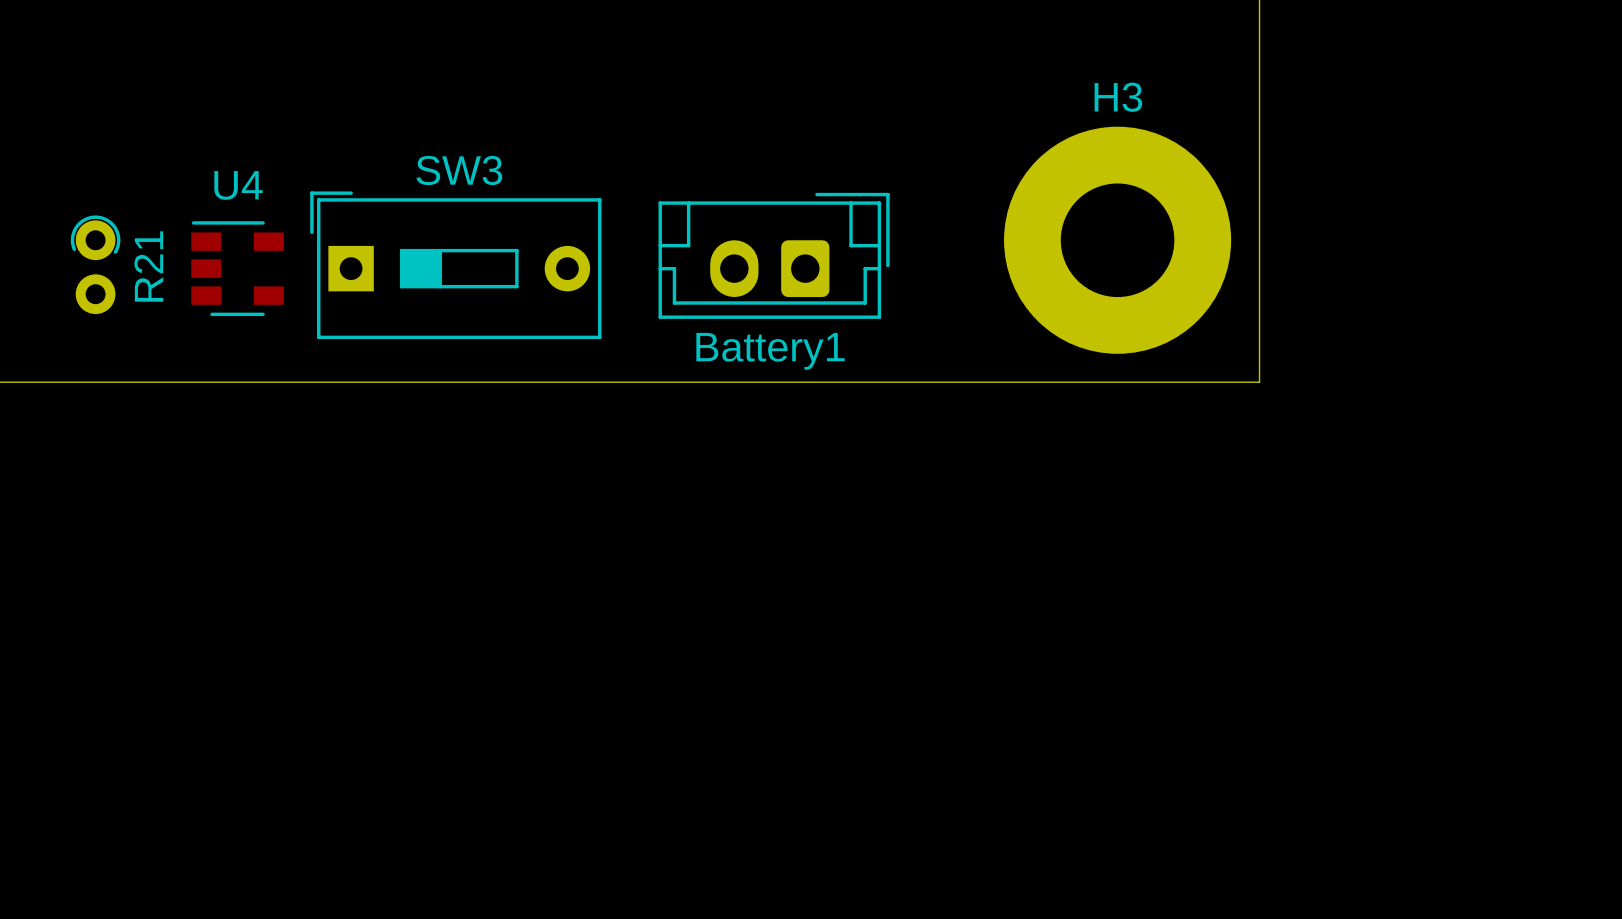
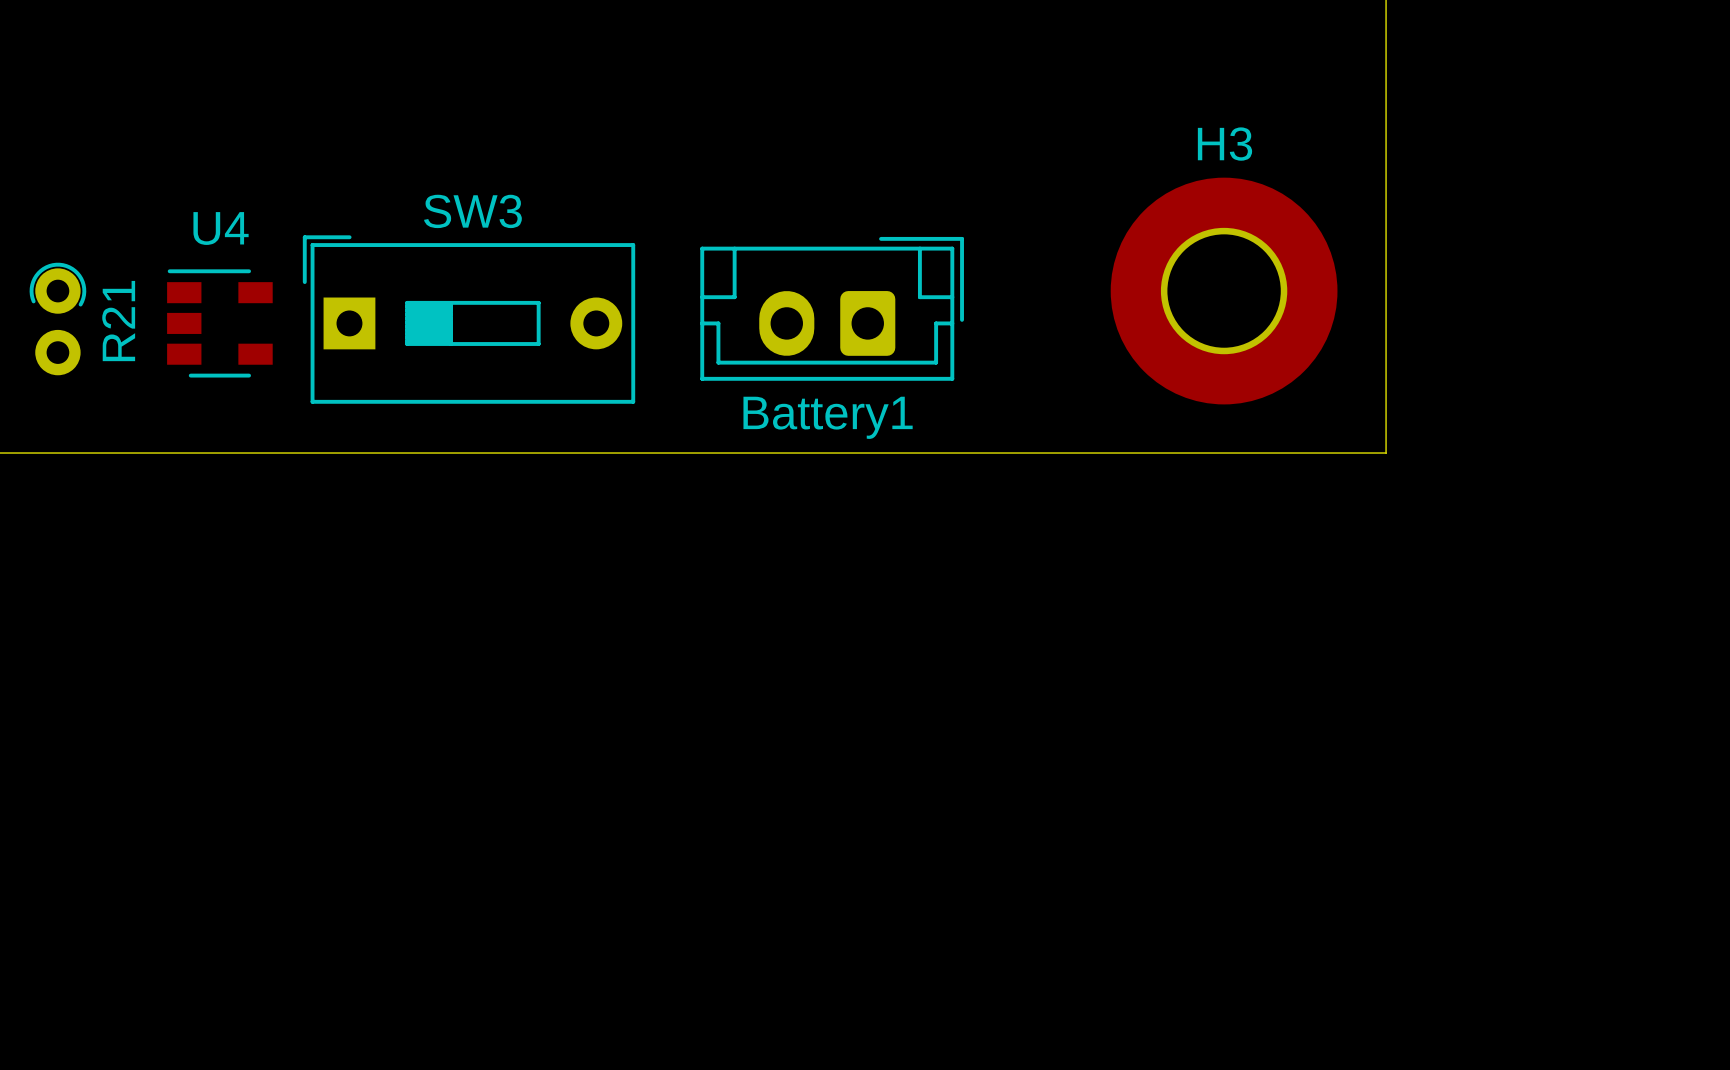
H3 footprint: [1004, 126, 1232, 354] -> [1110, 177, 1338, 405]

